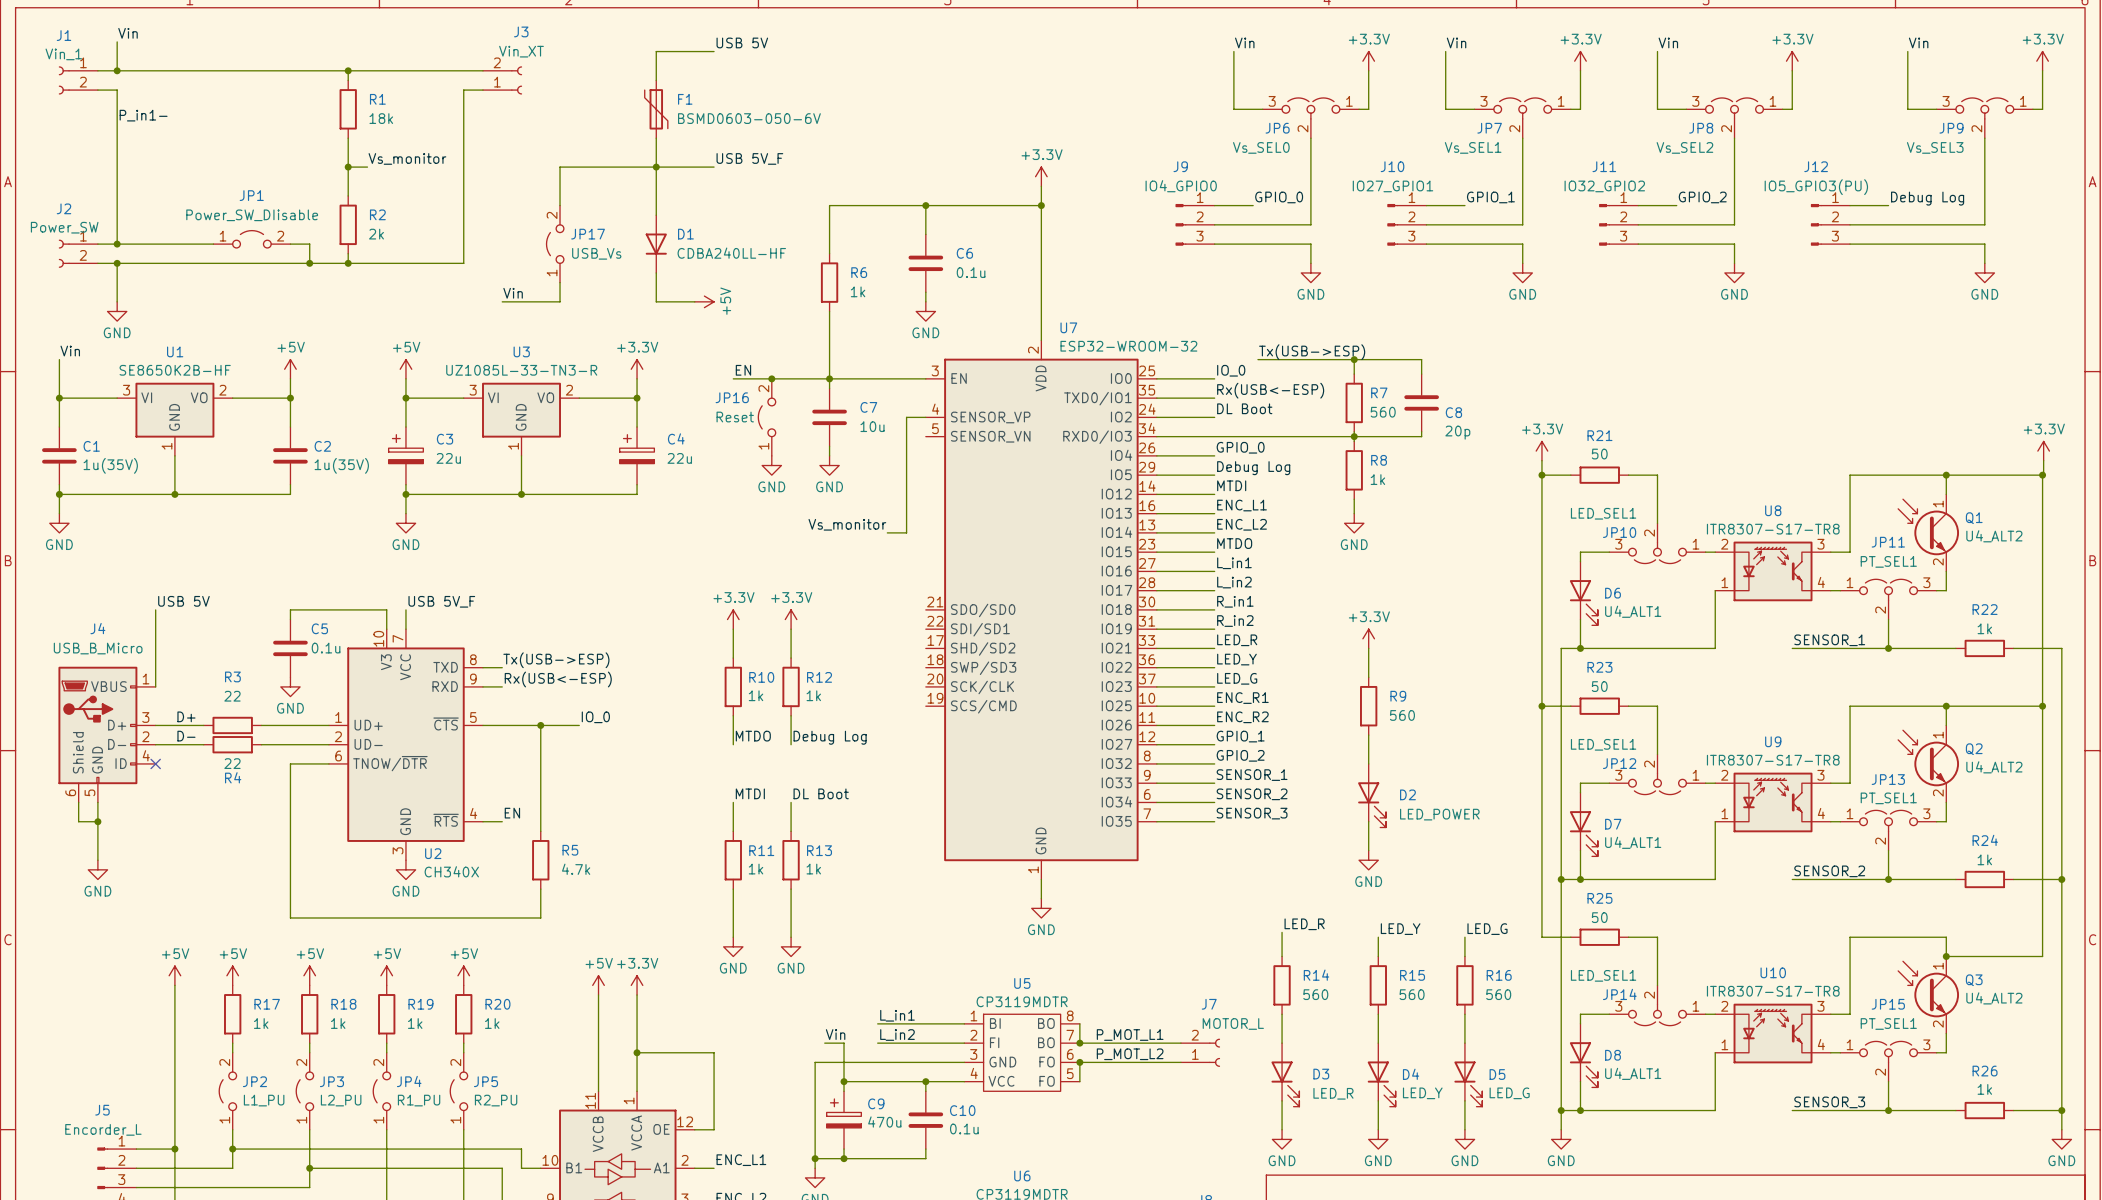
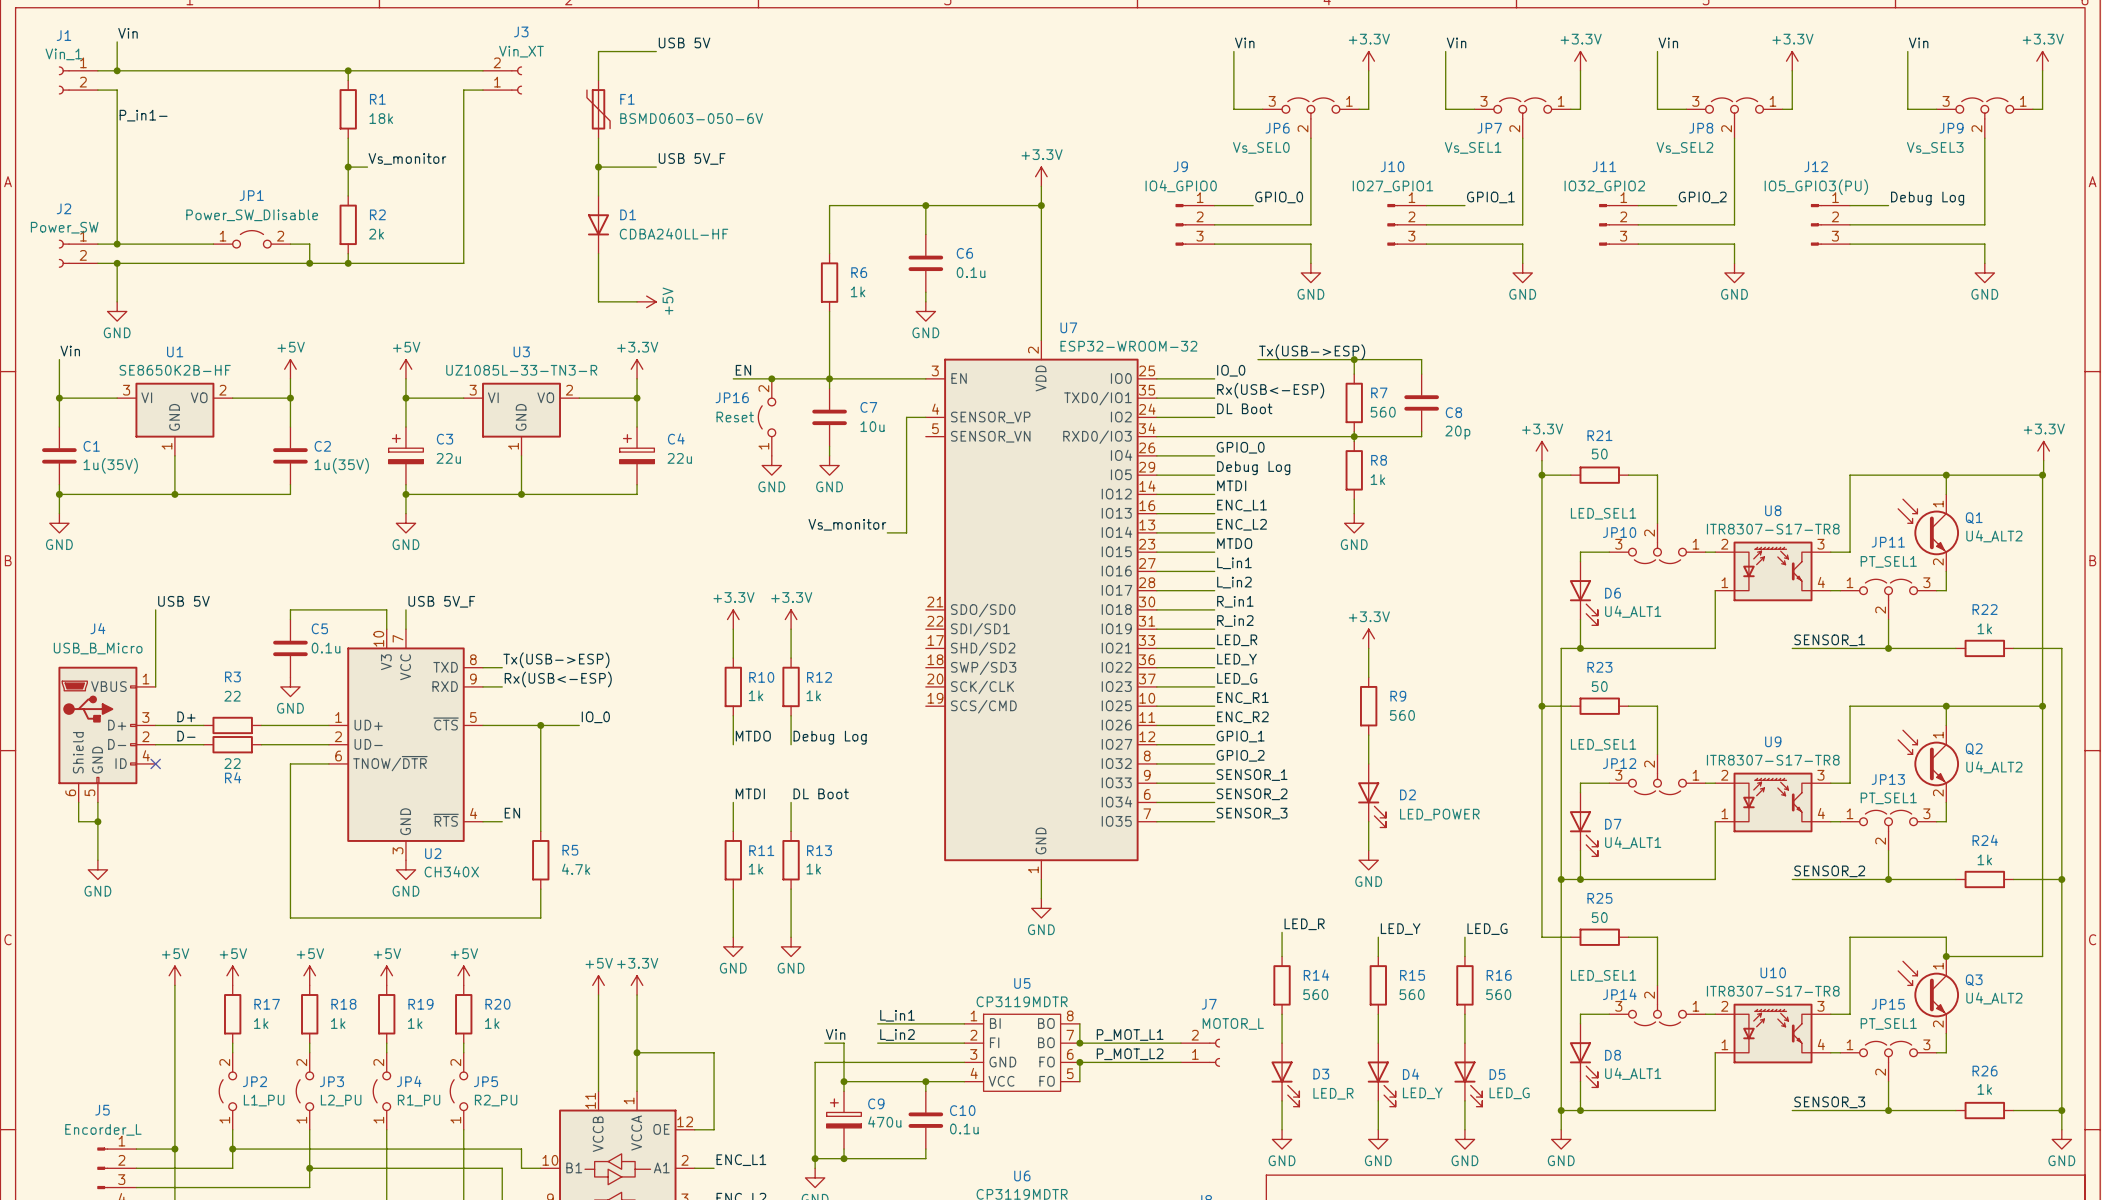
label position: USB 5V (742, 42) -> USB 5V (684, 42)
wire: (714, 51) (656, 51) (656, 80) -> (656, 51) (598, 51) (598, 80)
F1 position: (656, 109) -> (598, 109)
wire: none -> (598, 138) (598, 195)
wire: (656, 138) (656, 215) -> none
label position: USB 5V_F (749, 158) -> USB 5V_F (692, 158)
wire: (598, 167) (560, 167) (560, 205) -> none
junction: none -> (598, 167)
wire: (656, 167) (714, 167) -> none
junction: (656, 167) -> none
JP17: USB_Vs (555, 244) -> none
D1 position: (656, 244) -> (598, 224)
wire: none -> (598, 253) (598, 301) (637, 301)
wire: (656, 272) (656, 301) (694, 301) -> none
wire: (560, 282) (560, 301) (502, 301) -> none
label: Vin (513, 293) -> none
power symbol position: +5V (704, 301) -> +5V (646, 301)

